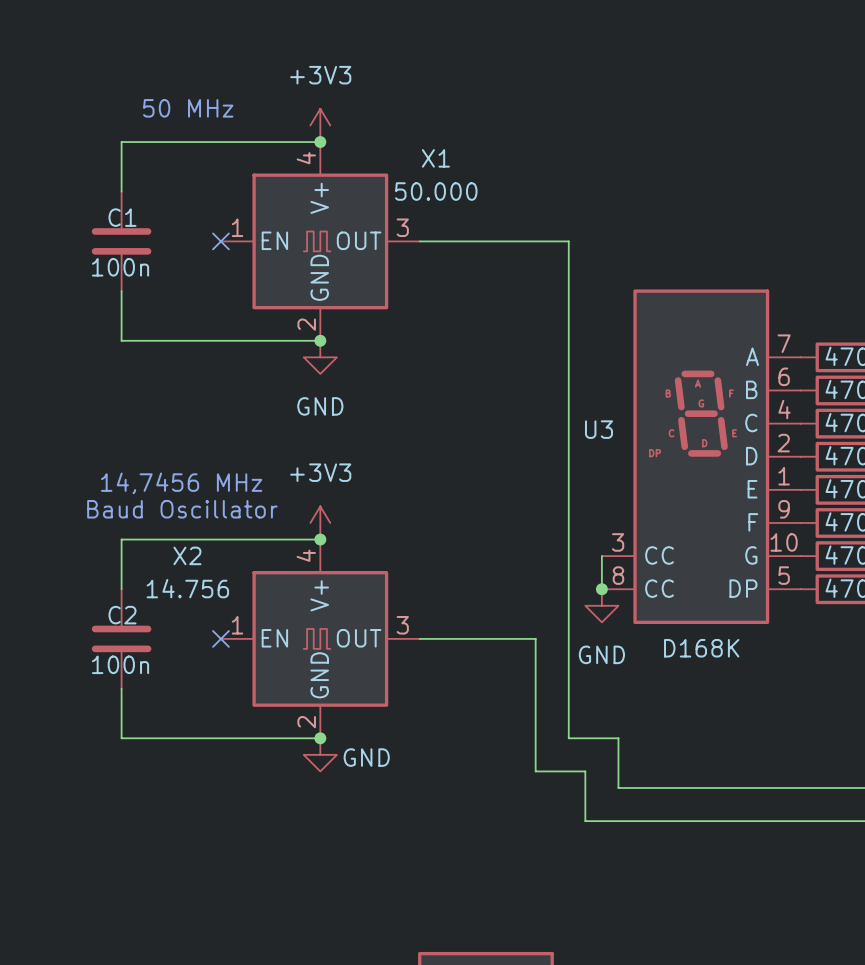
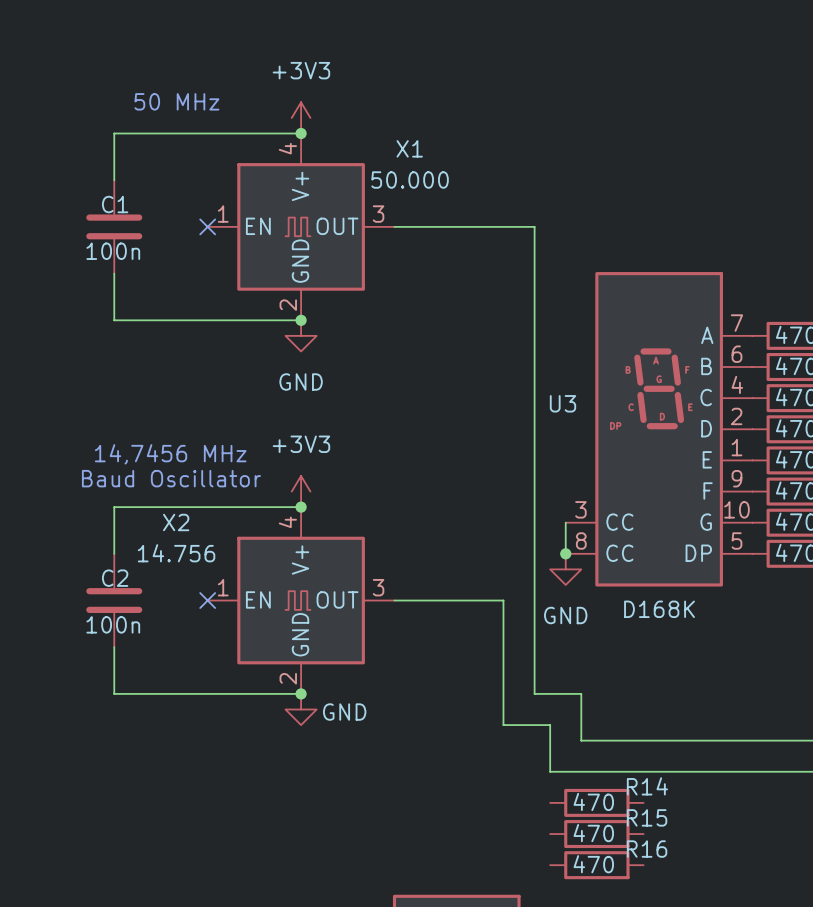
R14: none -> 470 (596, 802)
R15: none -> 470 (596, 834)
R16: none -> 470 (596, 865)

